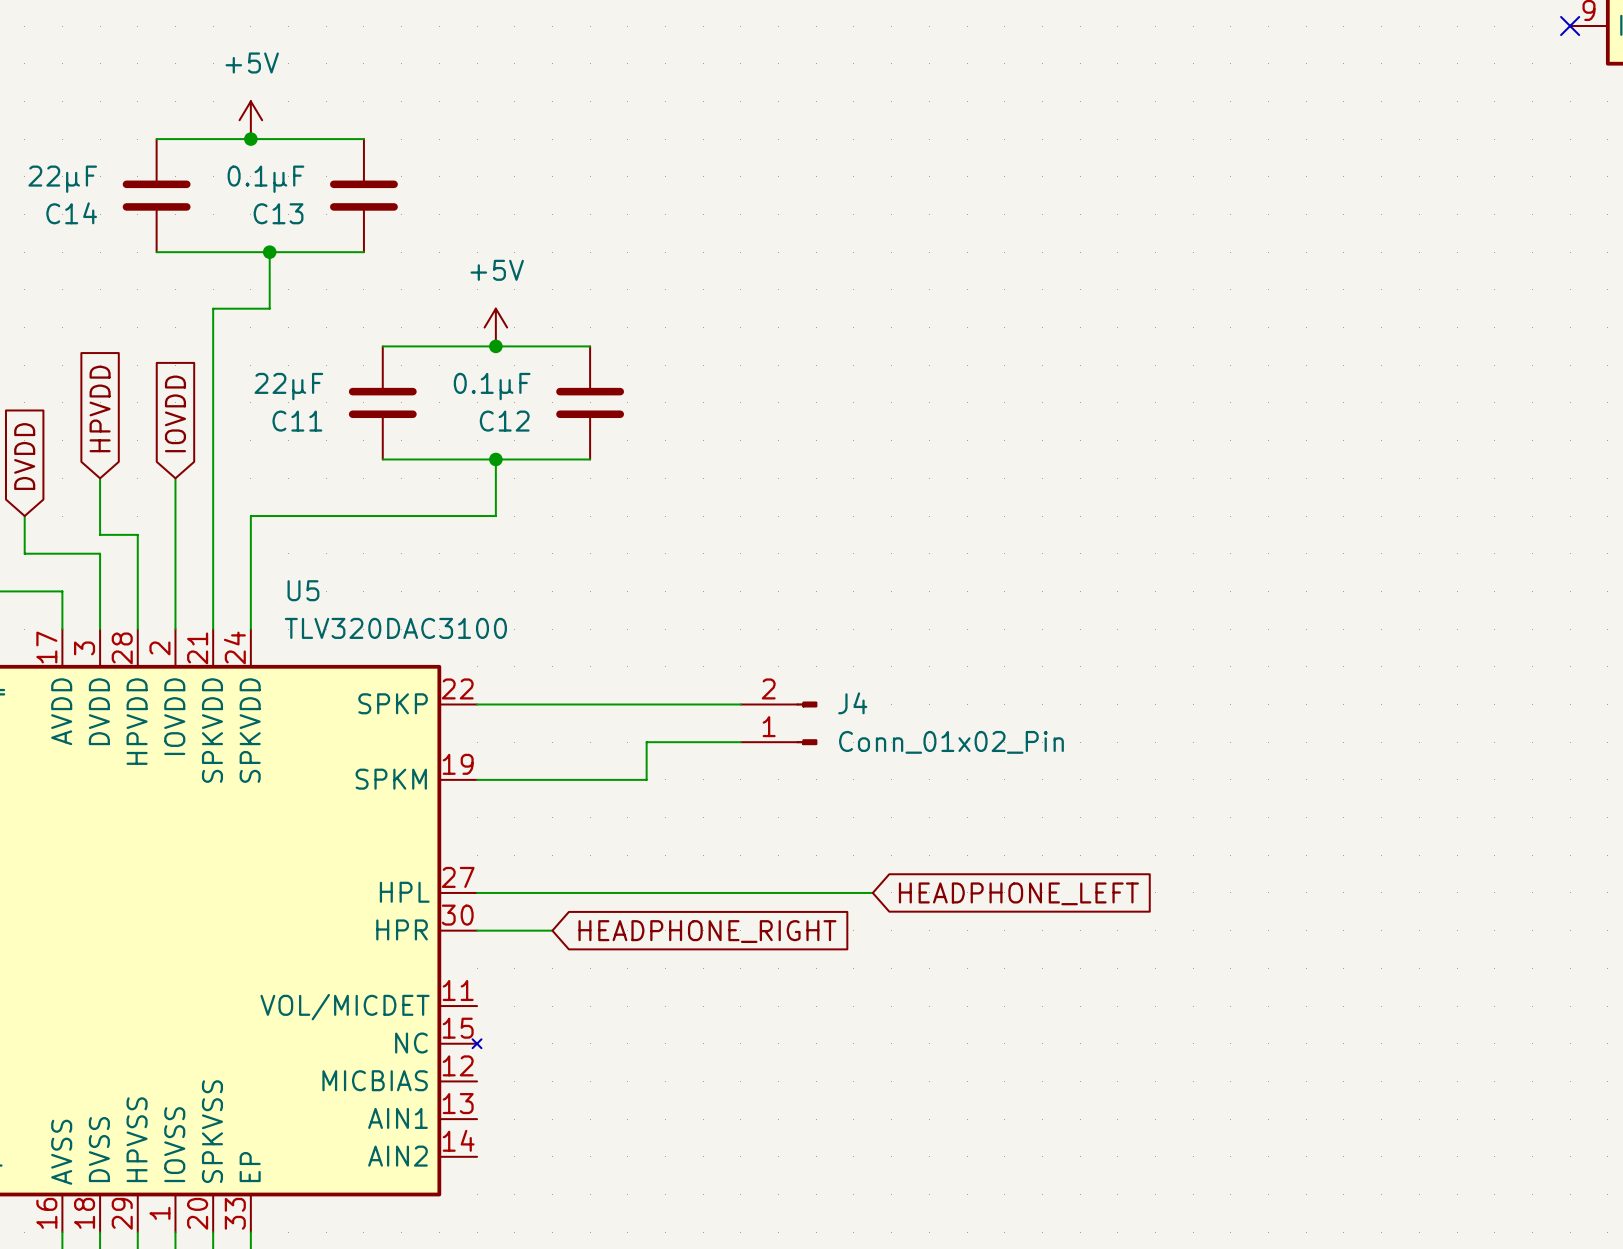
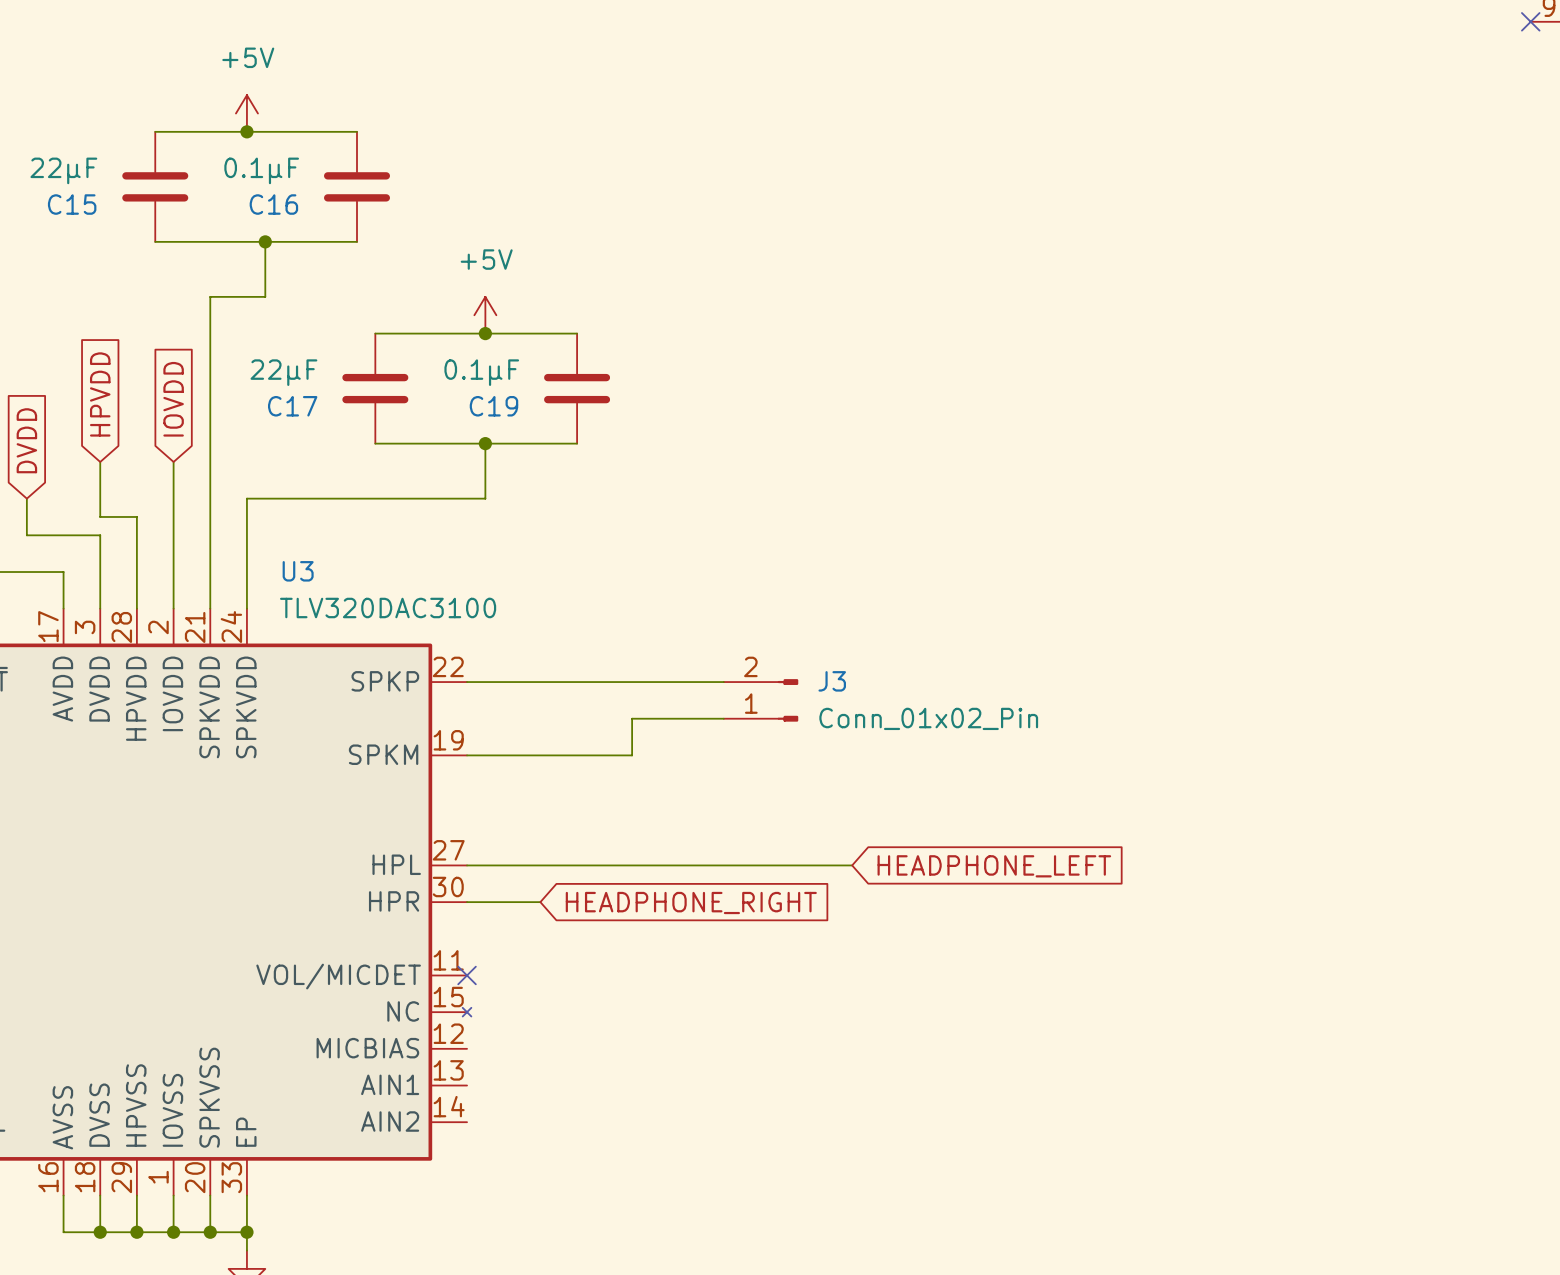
C14 name: C14 (71, 213) -> C15 (72, 204)
C13 name: C13 (278, 213) -> C16 (273, 204)
C11 name: C11 (297, 421) -> C17 (292, 406)
C12 name: C12 (504, 421) -> C19 (493, 406)
U5 name: U5 (303, 590) -> U3 (298, 571)
J4 name: J4 (852, 703) -> J3 (832, 681)
no-connect mark: none -> (467, 975)

